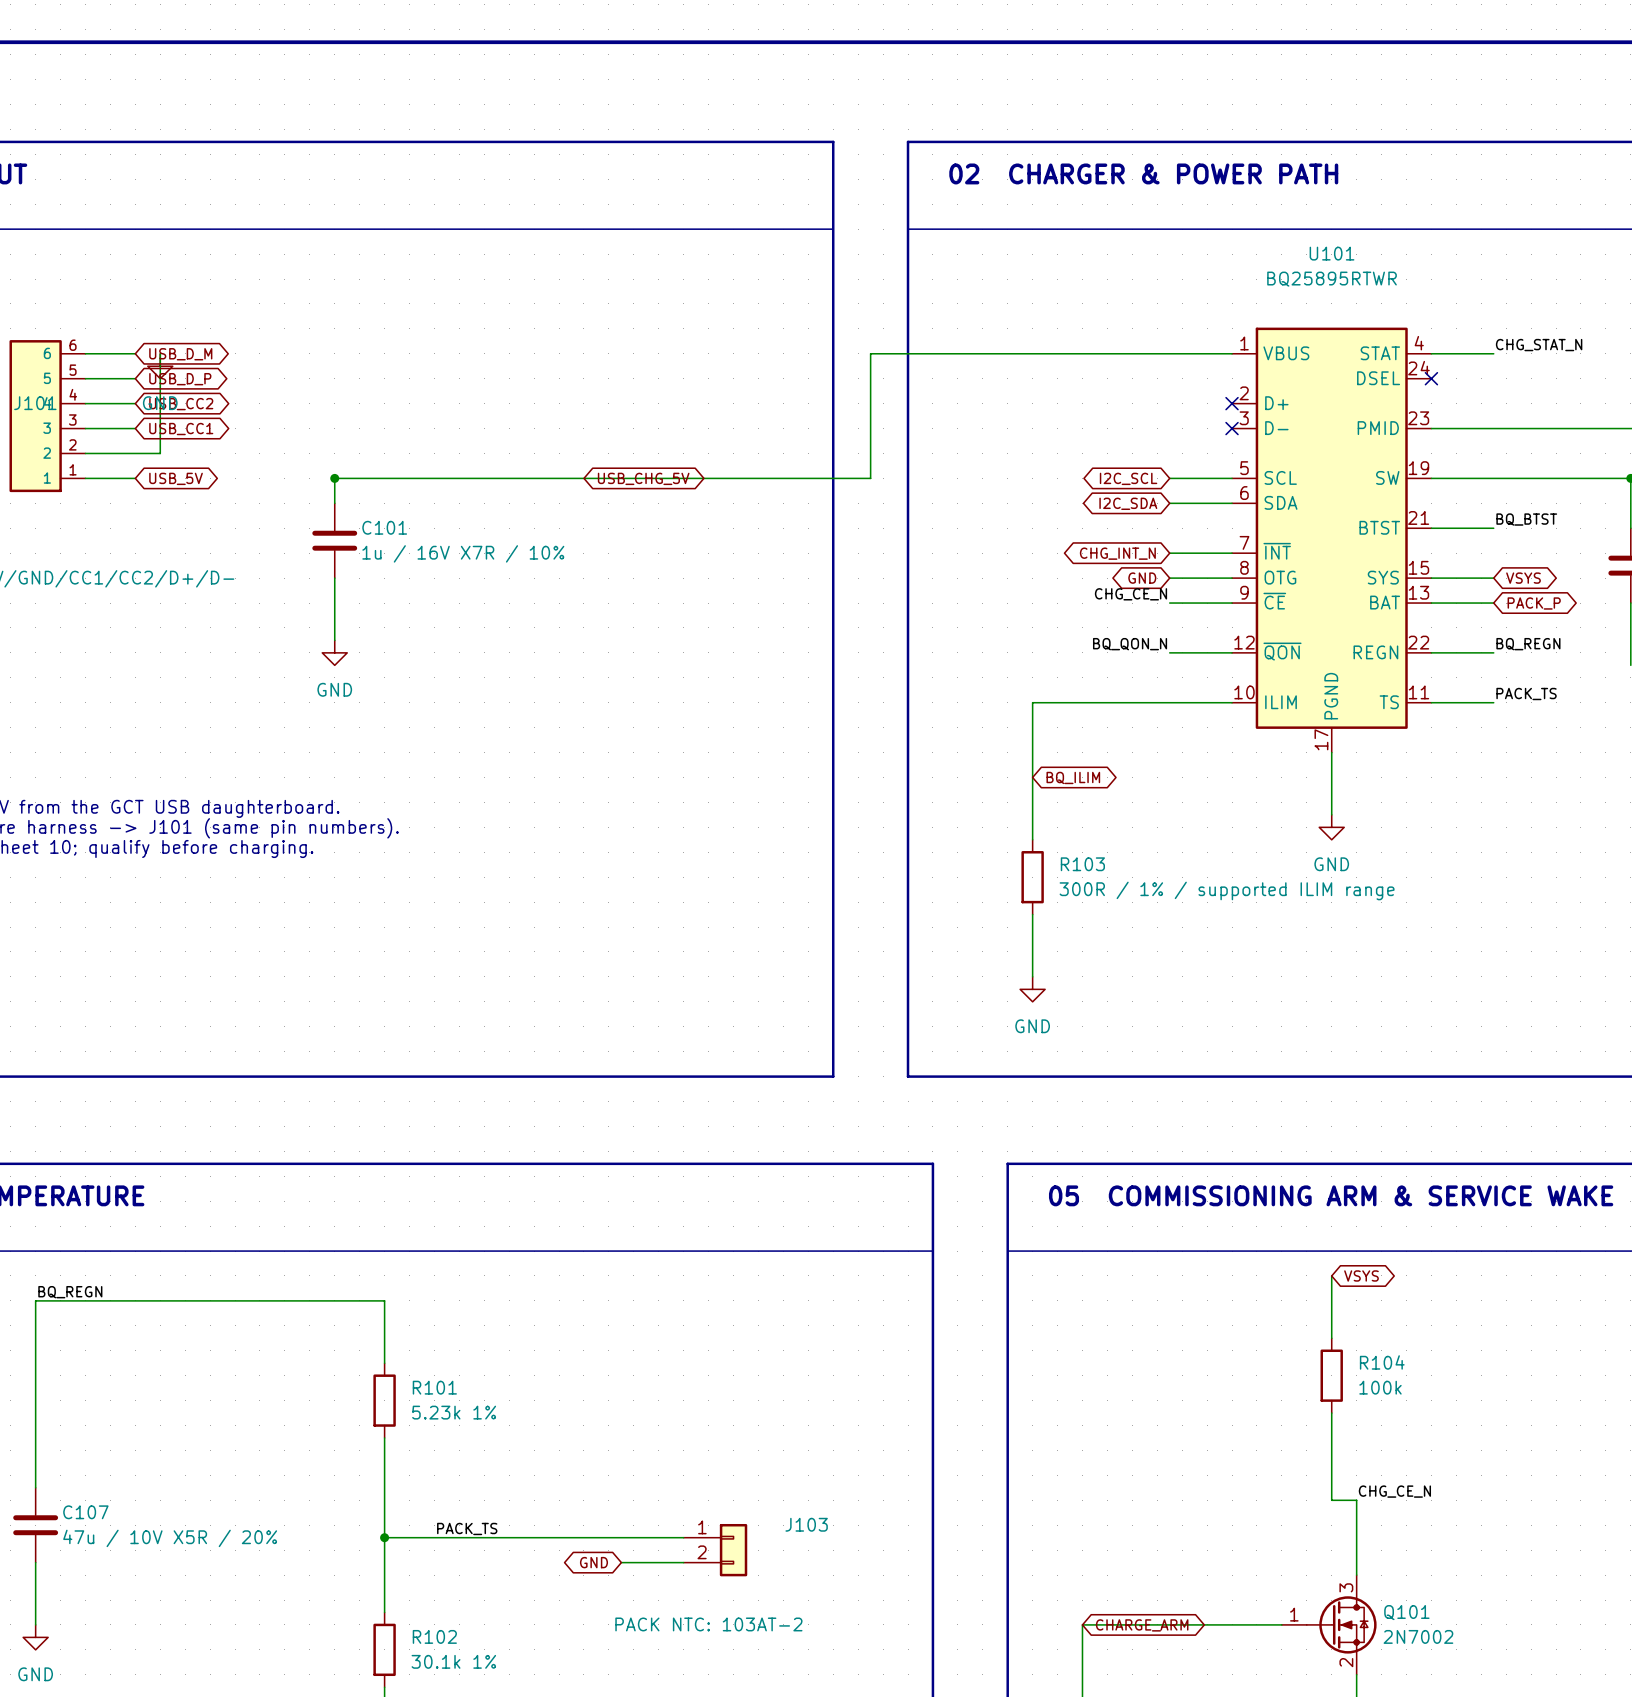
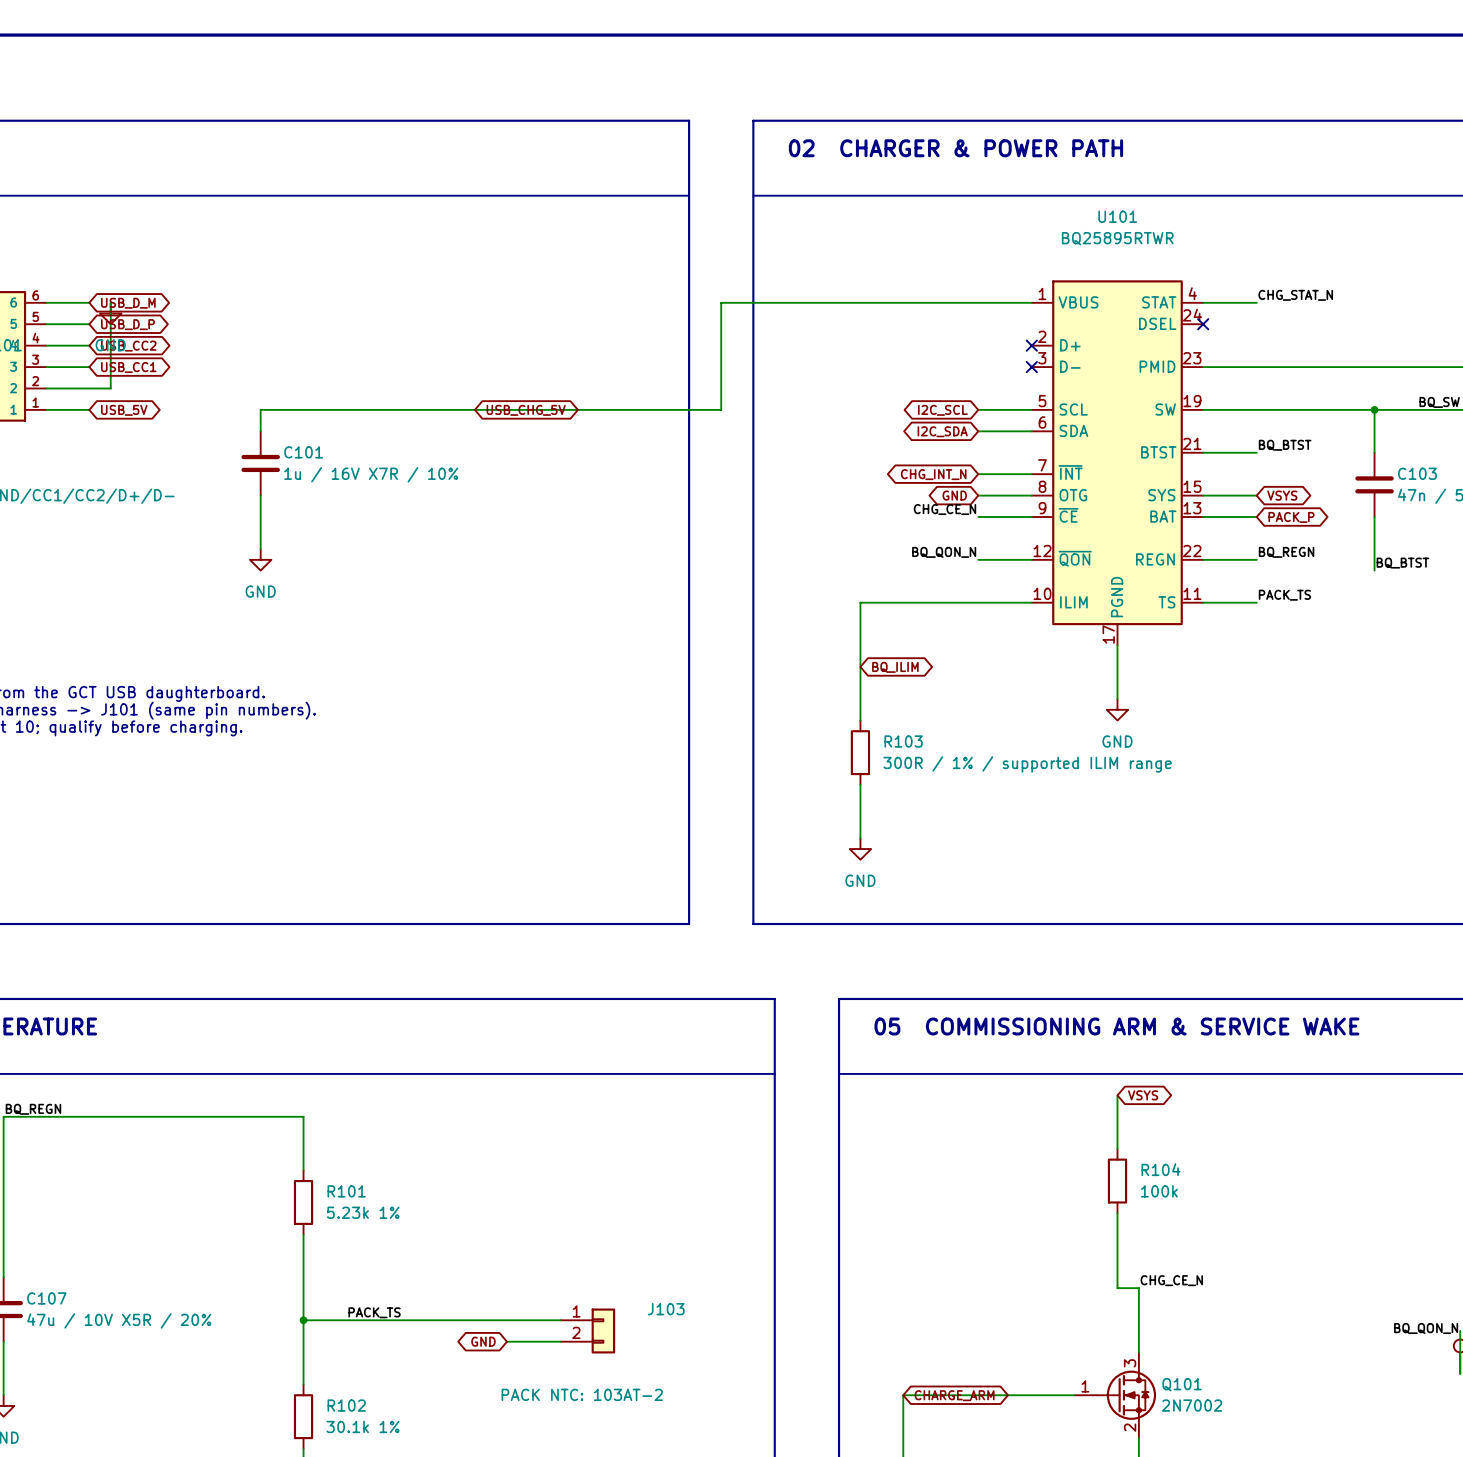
junction: (334, 478) -> none

